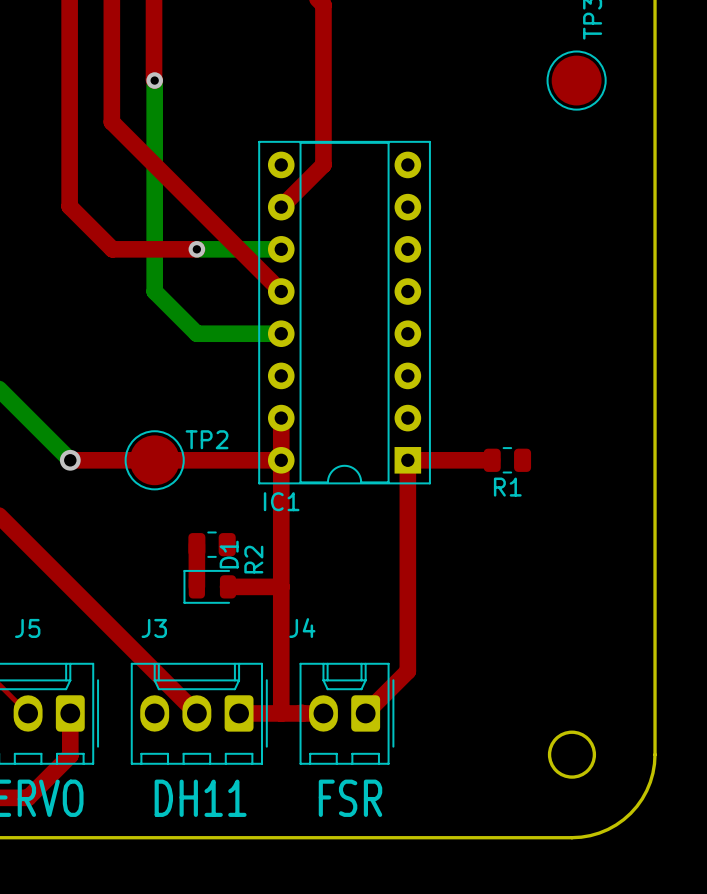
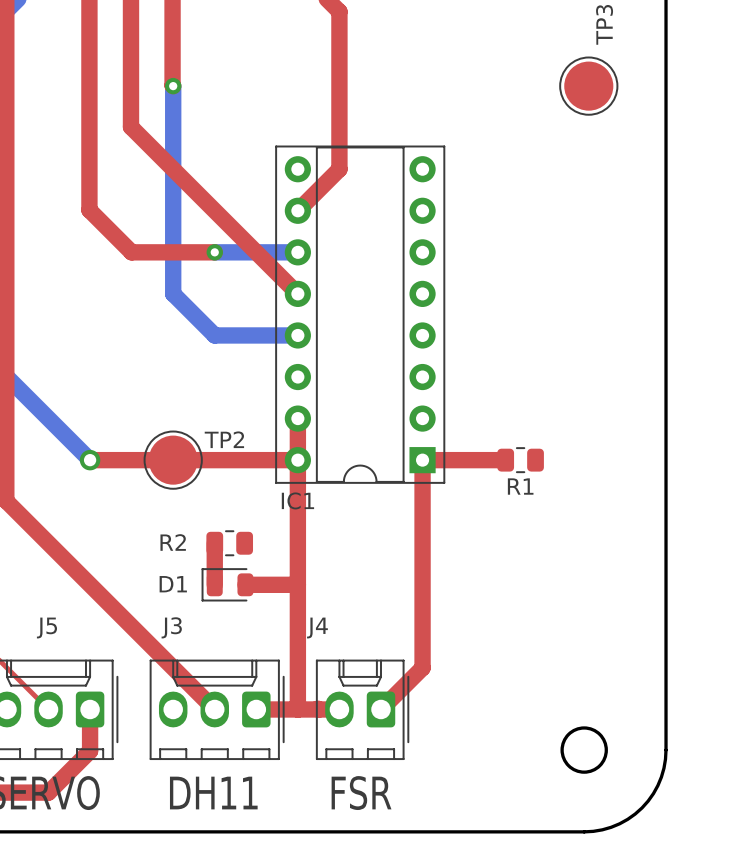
D1 name rotation: 0° (229, 554) -> 90° clockwise (173, 584)
D1 name position: D1 (229, 554) -> D1 (173, 584)
R2 name rotation: 0° (253, 559) -> 90° clockwise (173, 542)
R2 name position: R2 (253, 559) -> R2 (173, 542)

